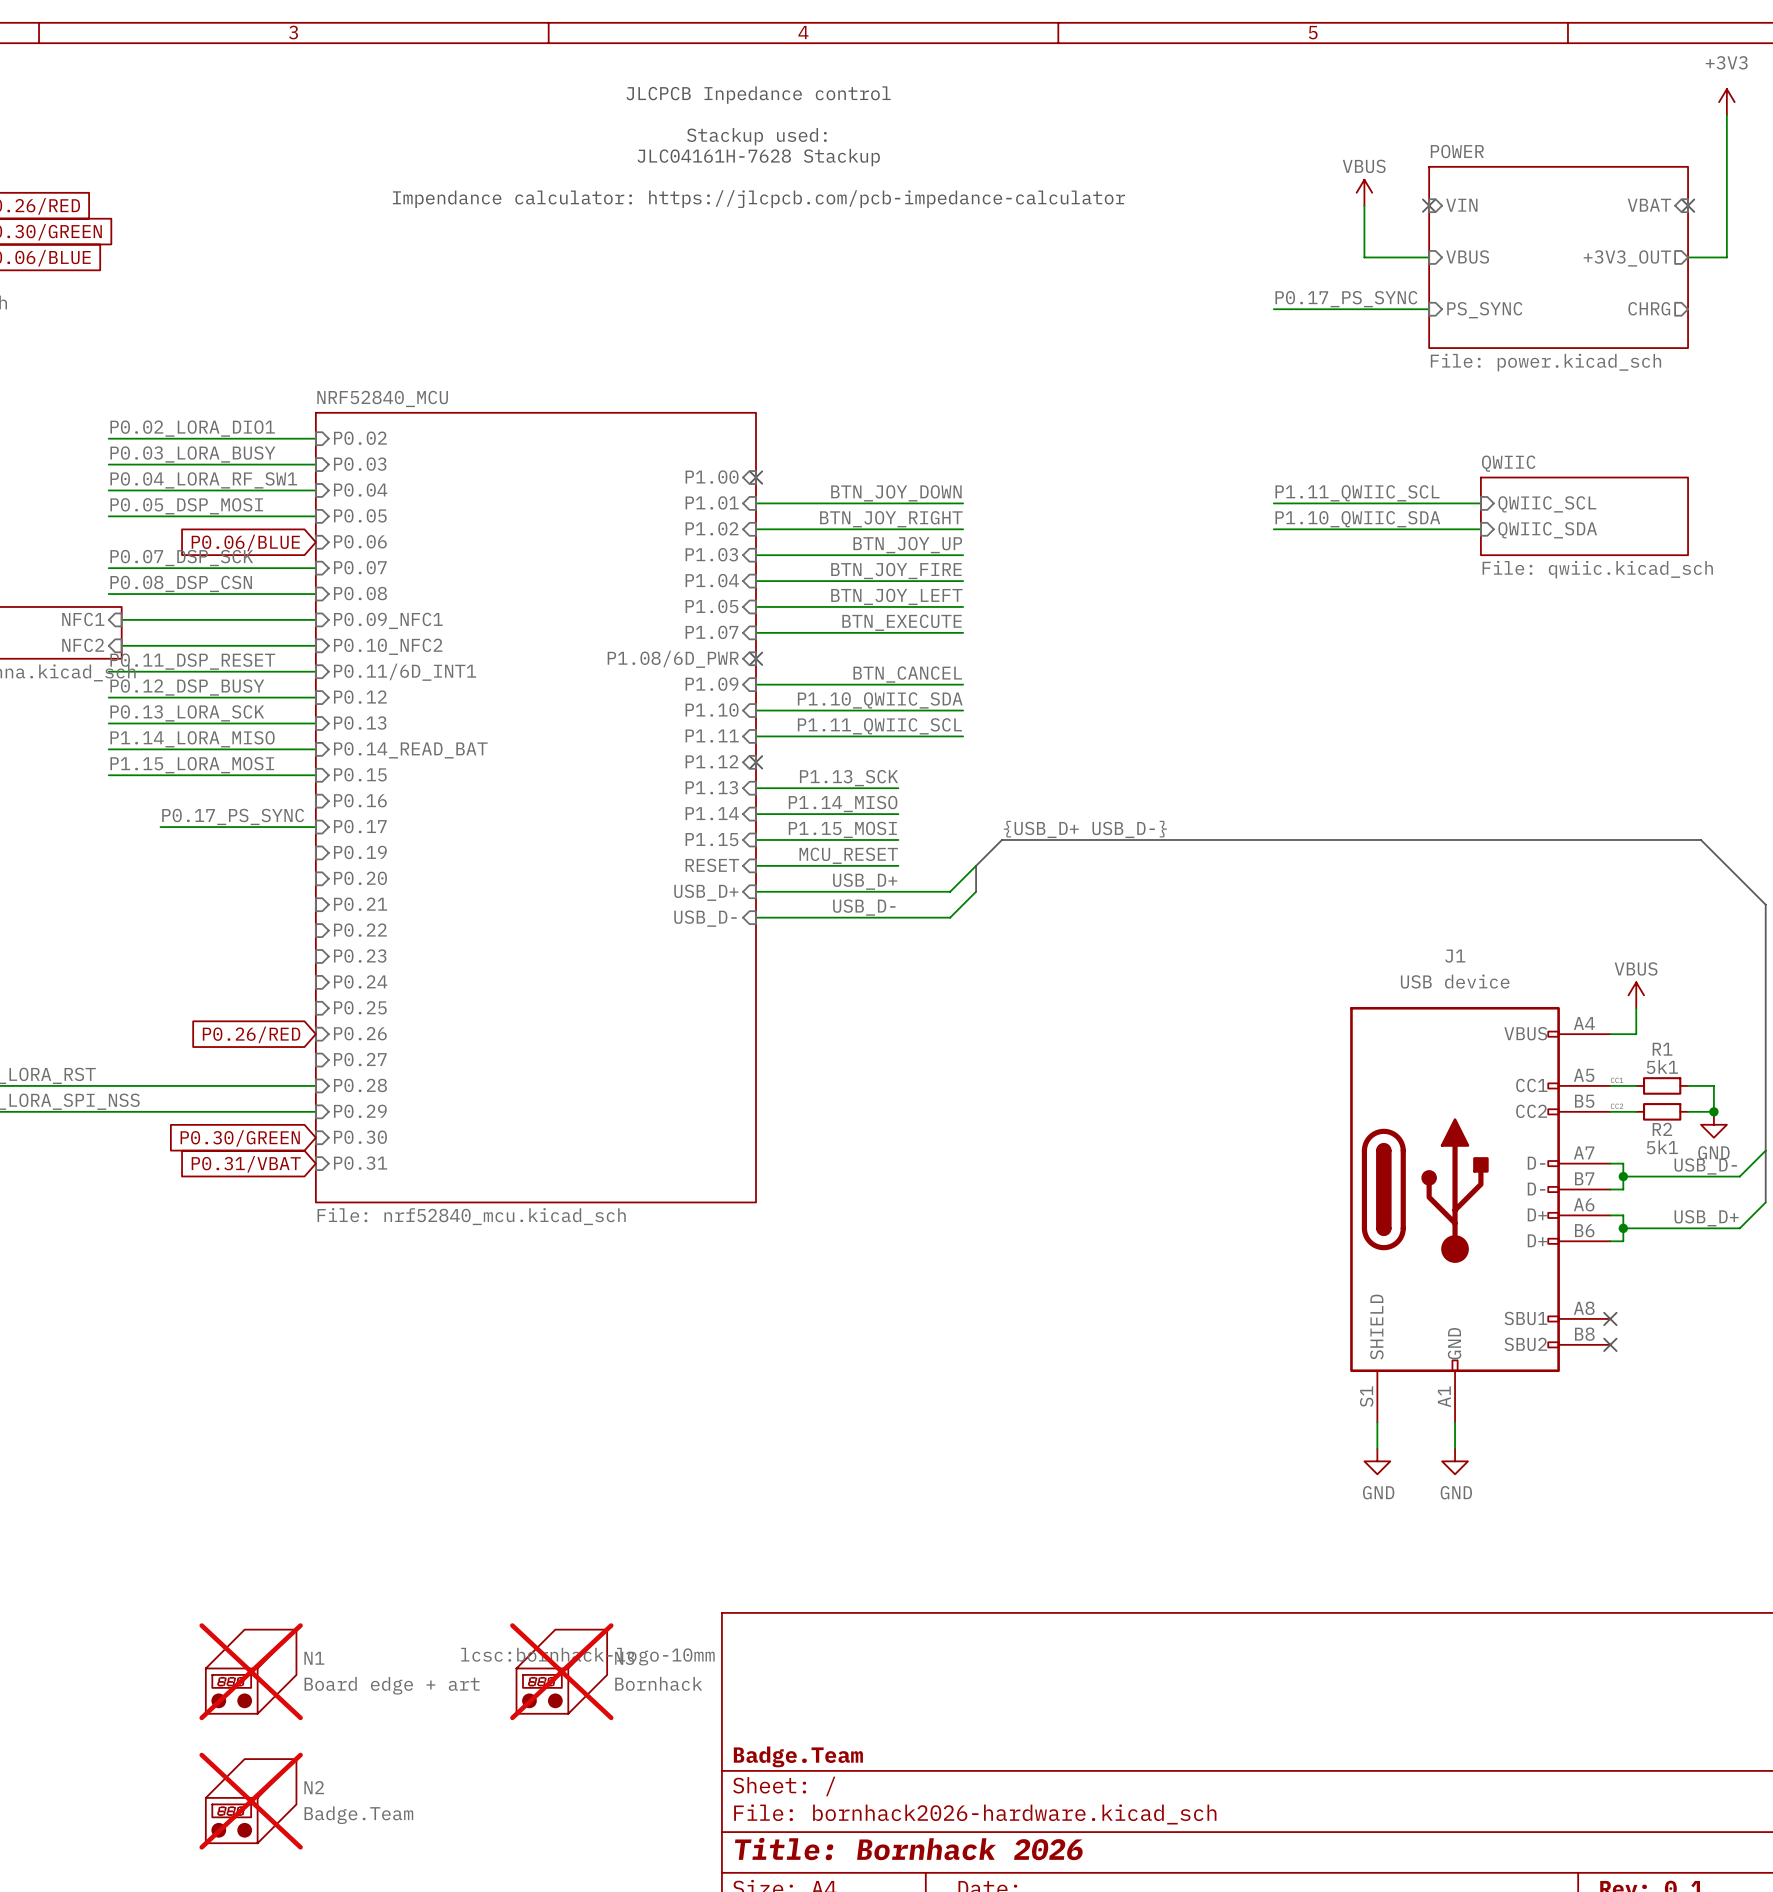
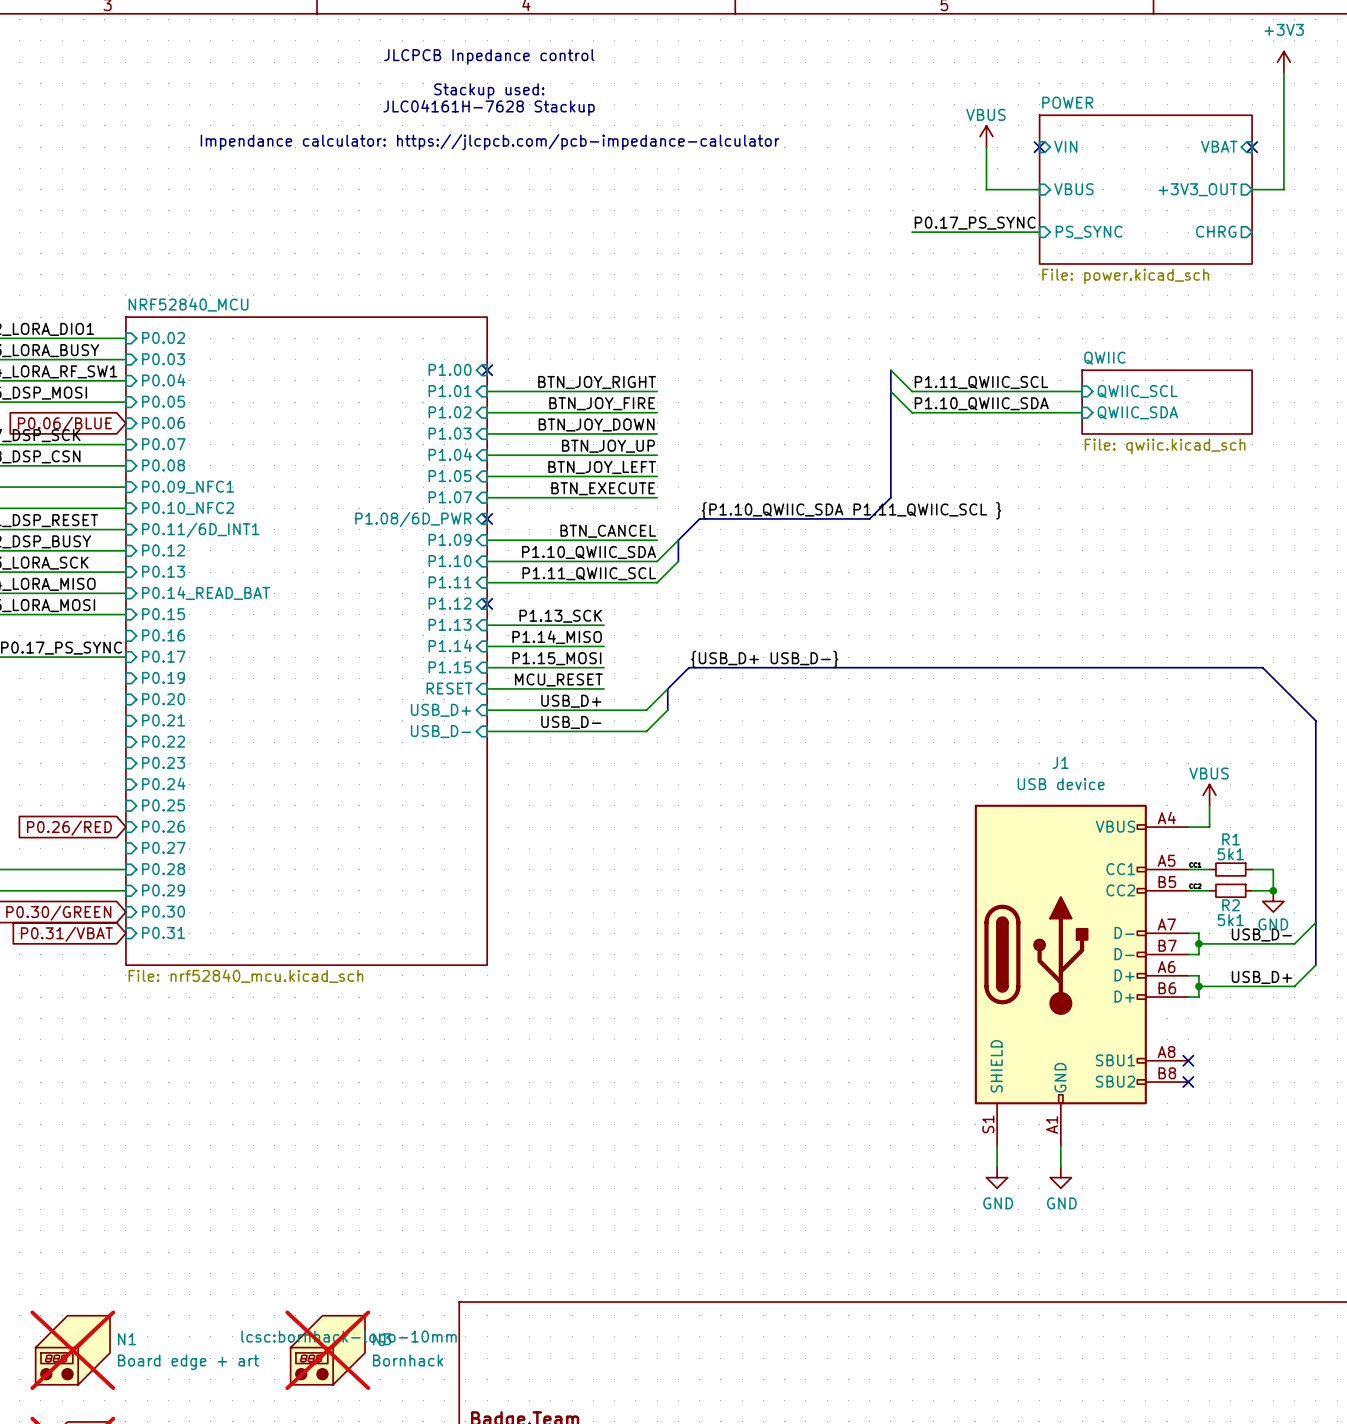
wire: none -> (890, 370) (912, 391)
bus: none -> (890, 370) (890, 497) (869, 518) (699, 518) (678, 540) (678, 561)
label: BTN_JOY_DOWN (896, 493) -> BTN_JOY_RIGHT (597, 382)
wire: none -> (890, 391) (912, 412)
label: BTN_JOY_RIGHT (891, 519) -> BTN_JOY_FIRE (602, 403)
label: BTN_JOY_UP (907, 545) -> BTN_JOY_DOWN (596, 425)
label: BTN_JOY_FIRE (896, 570) -> BTN_JOY_UP (608, 446)
label: none -> {P1.10_QWIIC_SDA P1.11_QWIIC_SCL } (851, 510)
wire: none -> (678, 540) (657, 561)
wire: none -> (678, 561) (657, 582)

